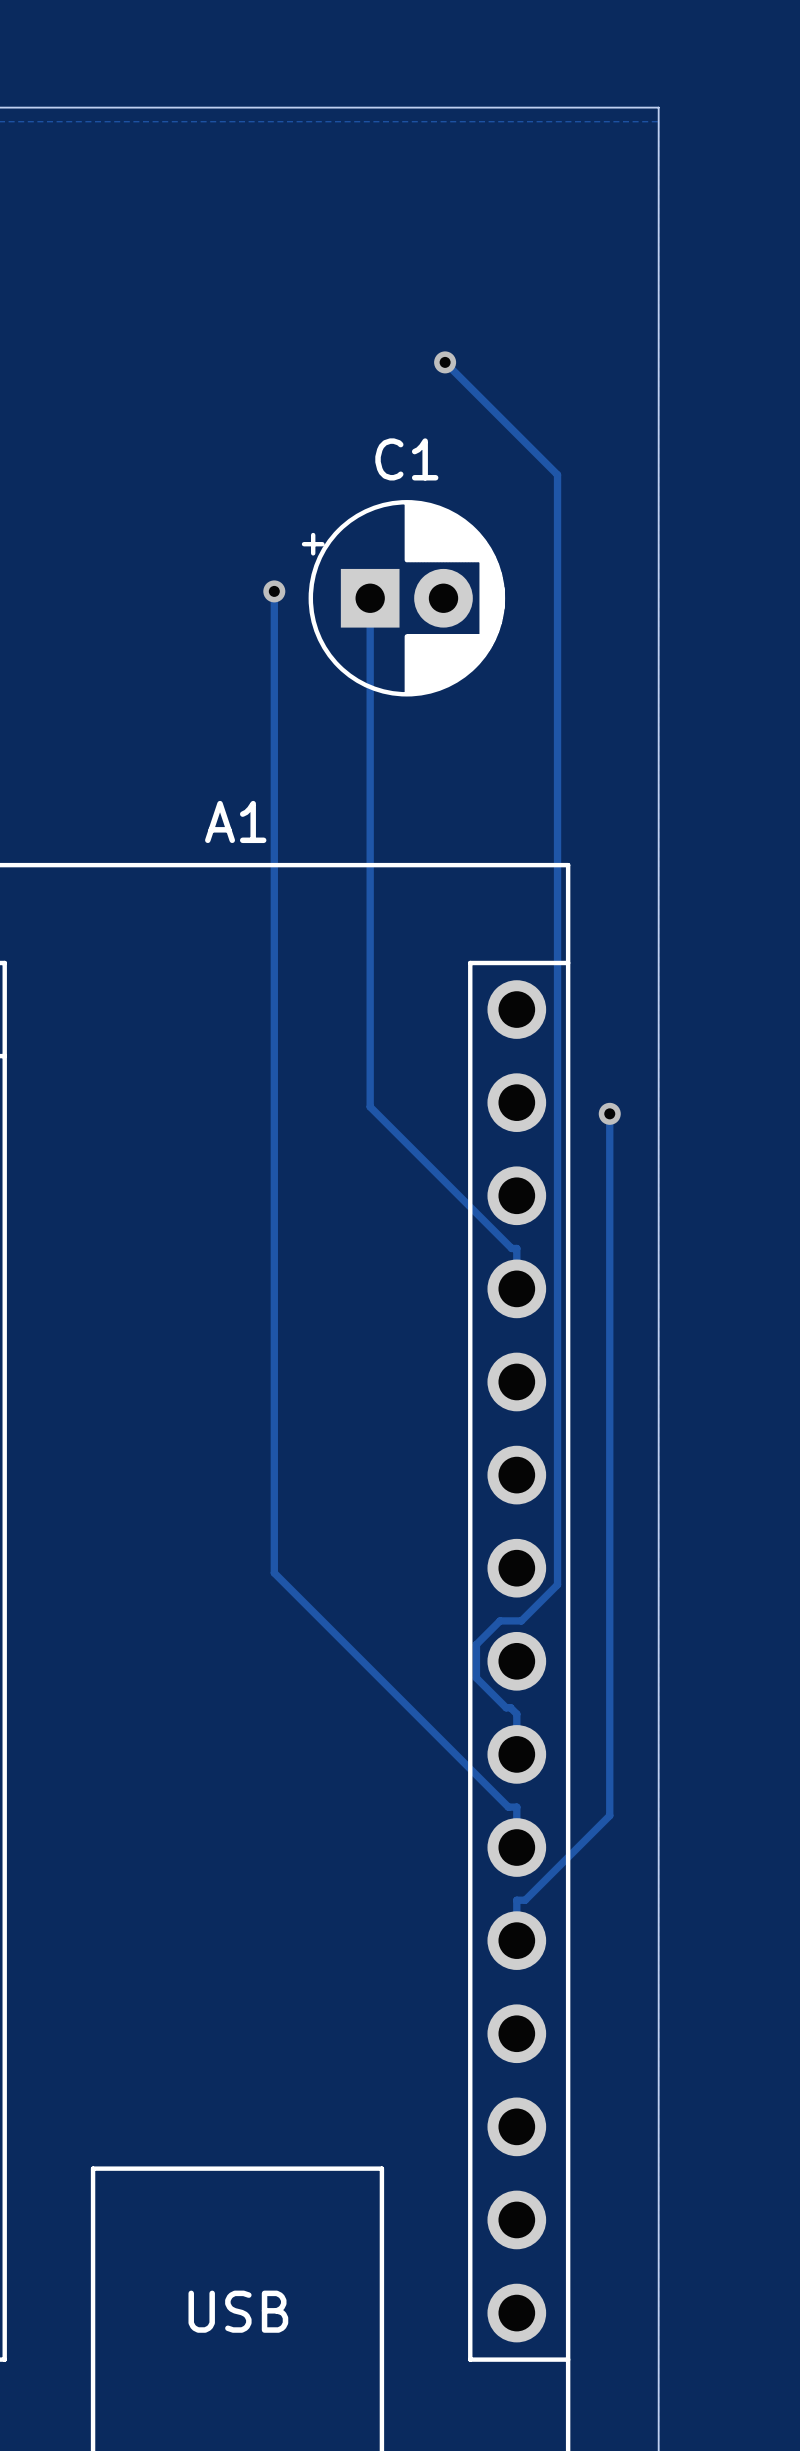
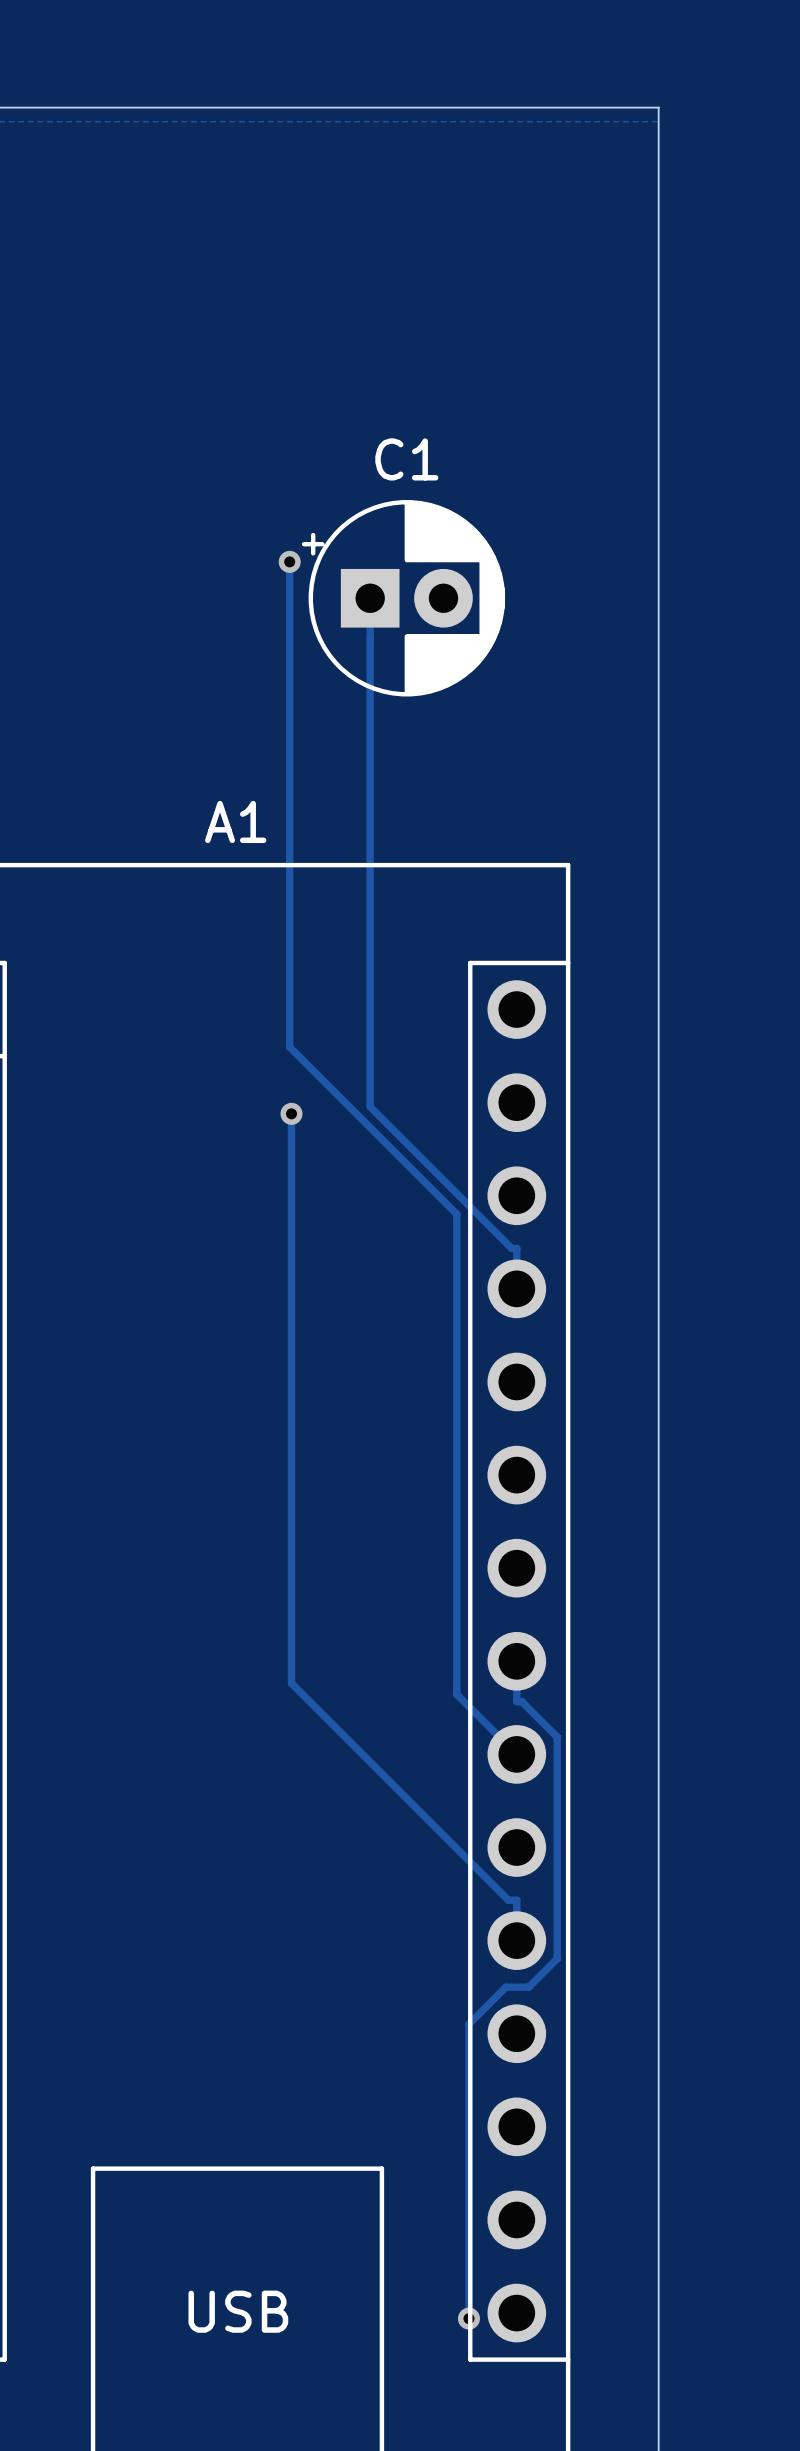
track: (445, 362) (557, 474) (557, 1584) (521, 1620) (500, 1620) (476, 1644) (476, 1678) (506, 1707) (510, 1707) (516, 1714) (516, 1754) -> (289, 561) (289, 1047) (456, 1214) (456, 1694) (516, 1754)
via: (445, 362) -> none
track: (274, 591) (274, 1573) (508, 1807) (516, 1807) (516, 1847) -> none
via position: (274, 591) -> (289, 561)
via: none -> (291, 1113)
track: (609, 1113) (609, 1815) (525, 1900) (516, 1900) -> (291, 1113) (291, 1683) (508, 1900) (516, 1900)
via: (609, 1113) -> none
track: none -> (516, 1661) (516, 1701) (521, 1701) (557, 1737) (557, 1958) (528, 1987) (505, 1987) (468, 2024) (468, 2318)
via: none -> (468, 2318)

